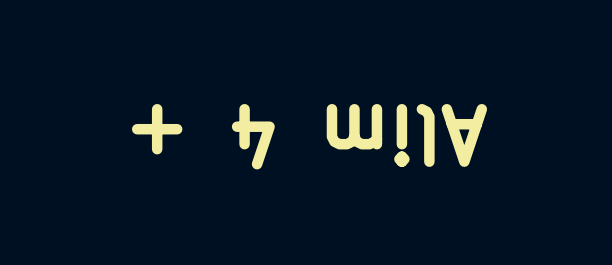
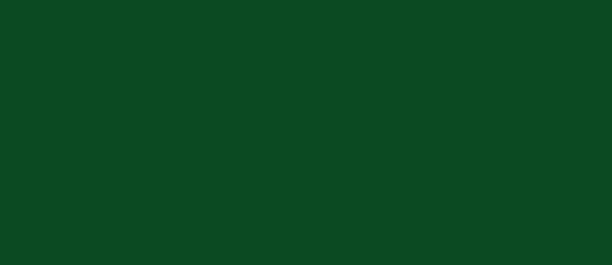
text: Alim 4 + (309, 136) -> none

